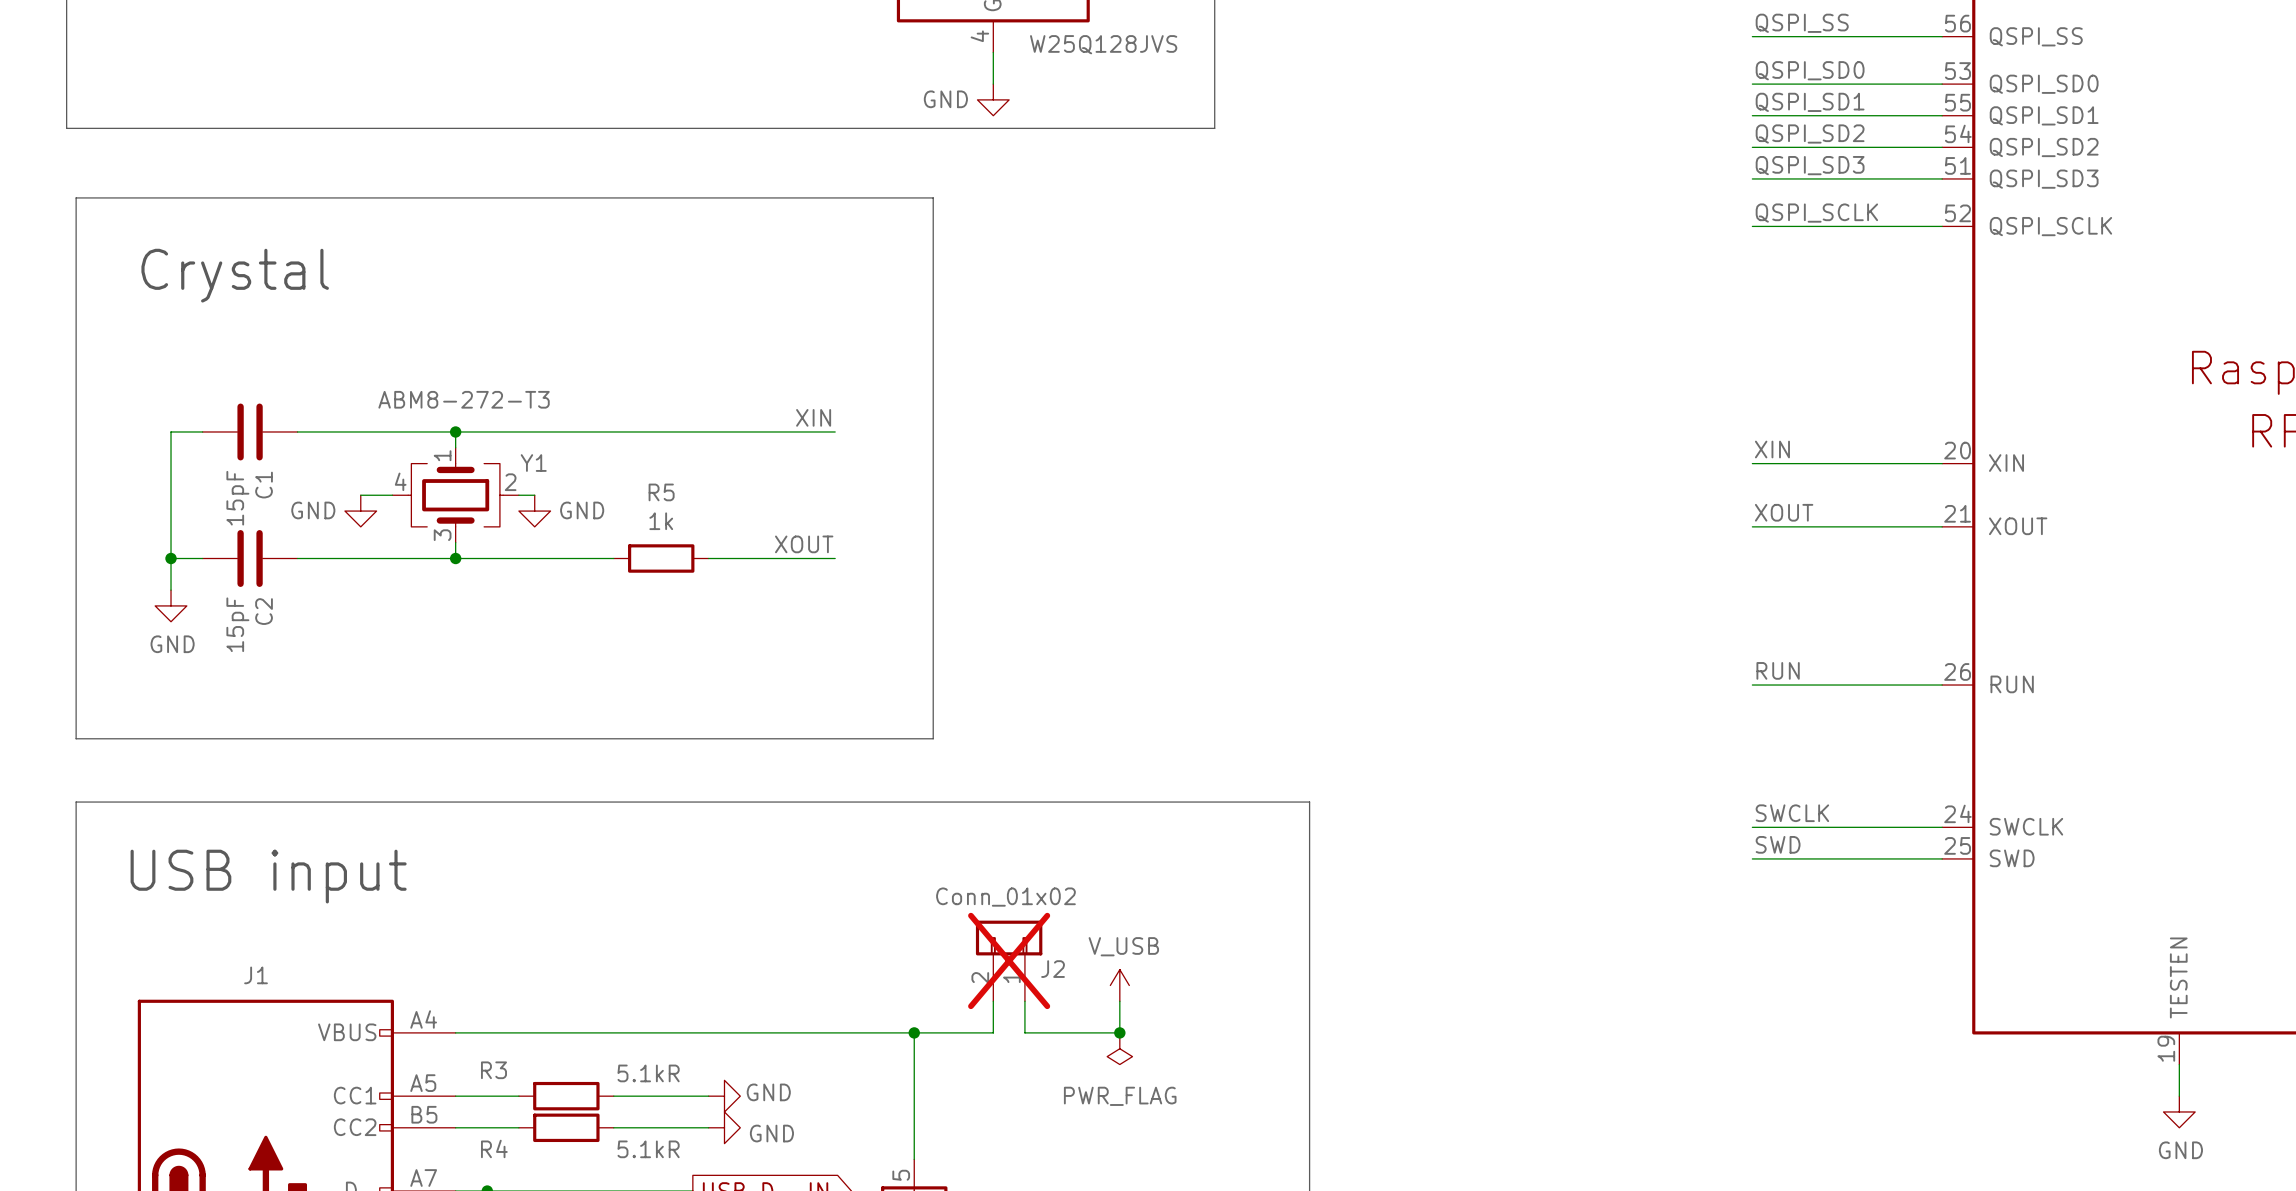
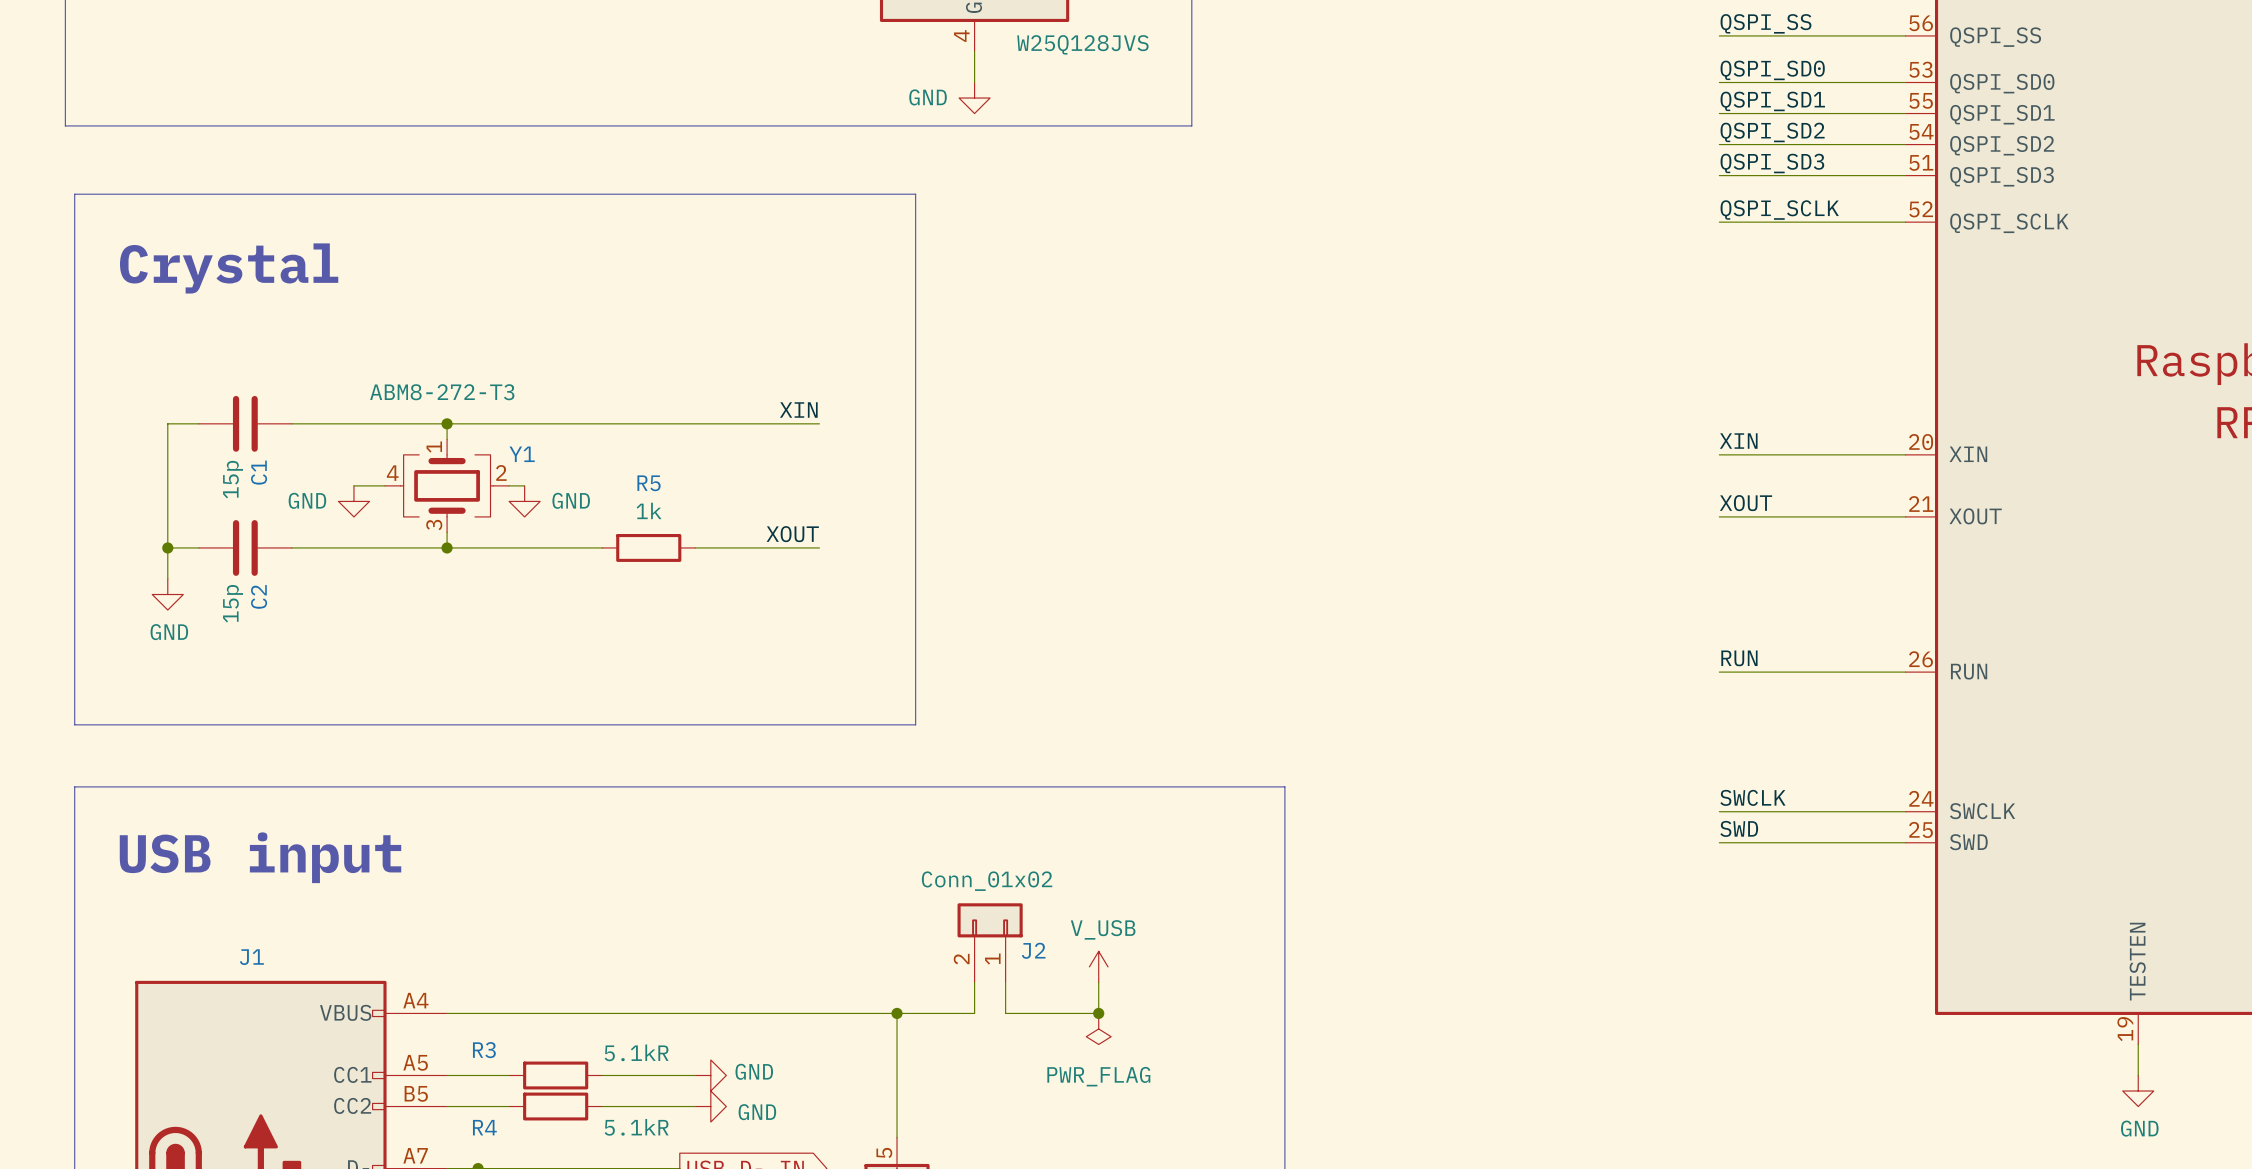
C1 value: 15pF (237, 498) -> 15p (233, 479)
C2 value: 15pF (237, 624) -> 15p (233, 603)
J2 do-not-place cross: (1009, 960) -> none

